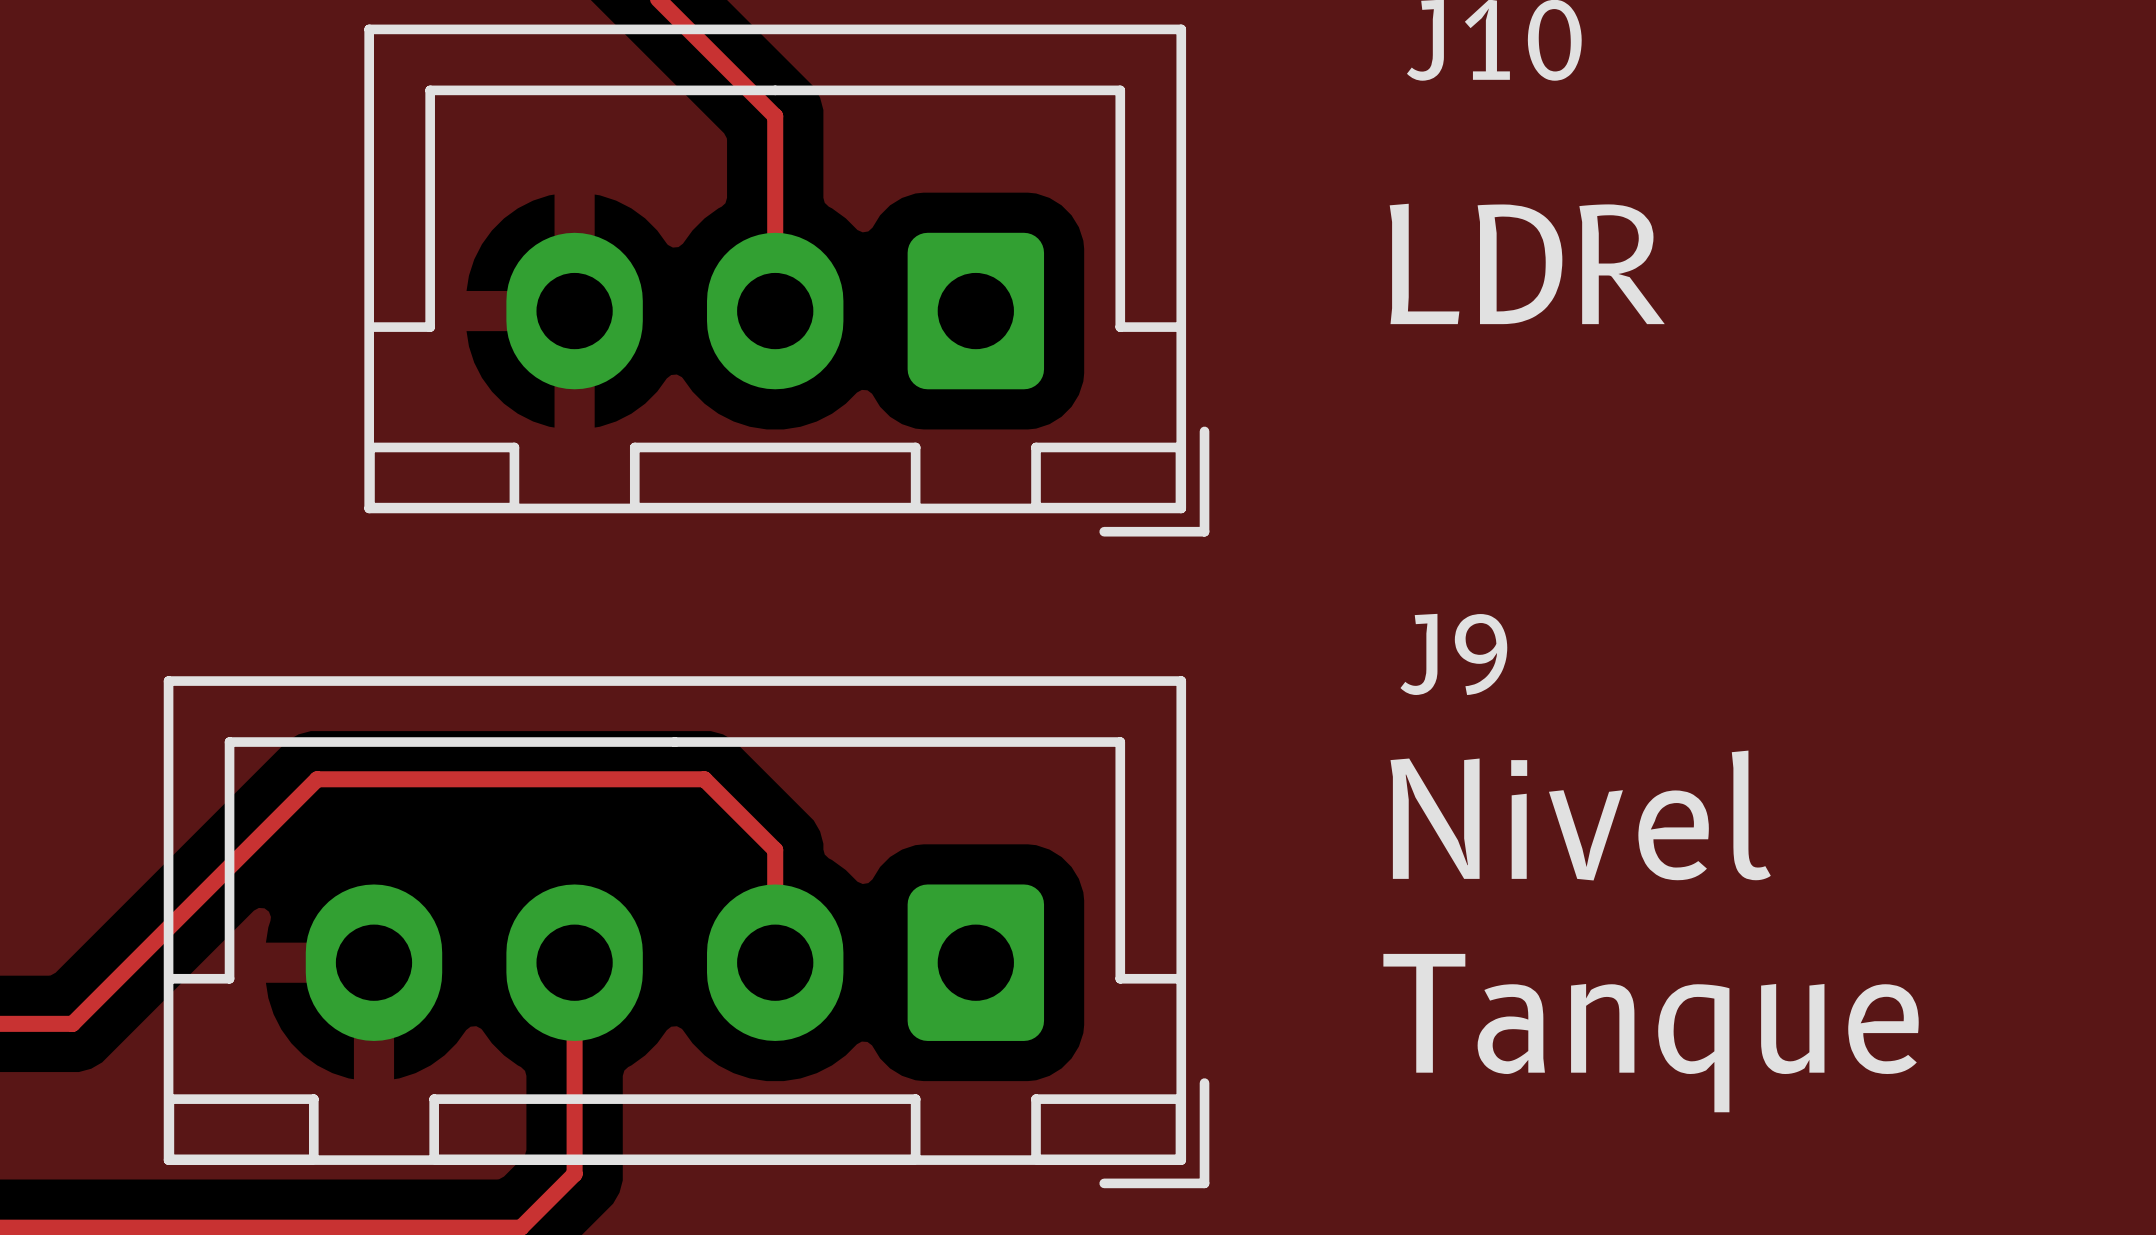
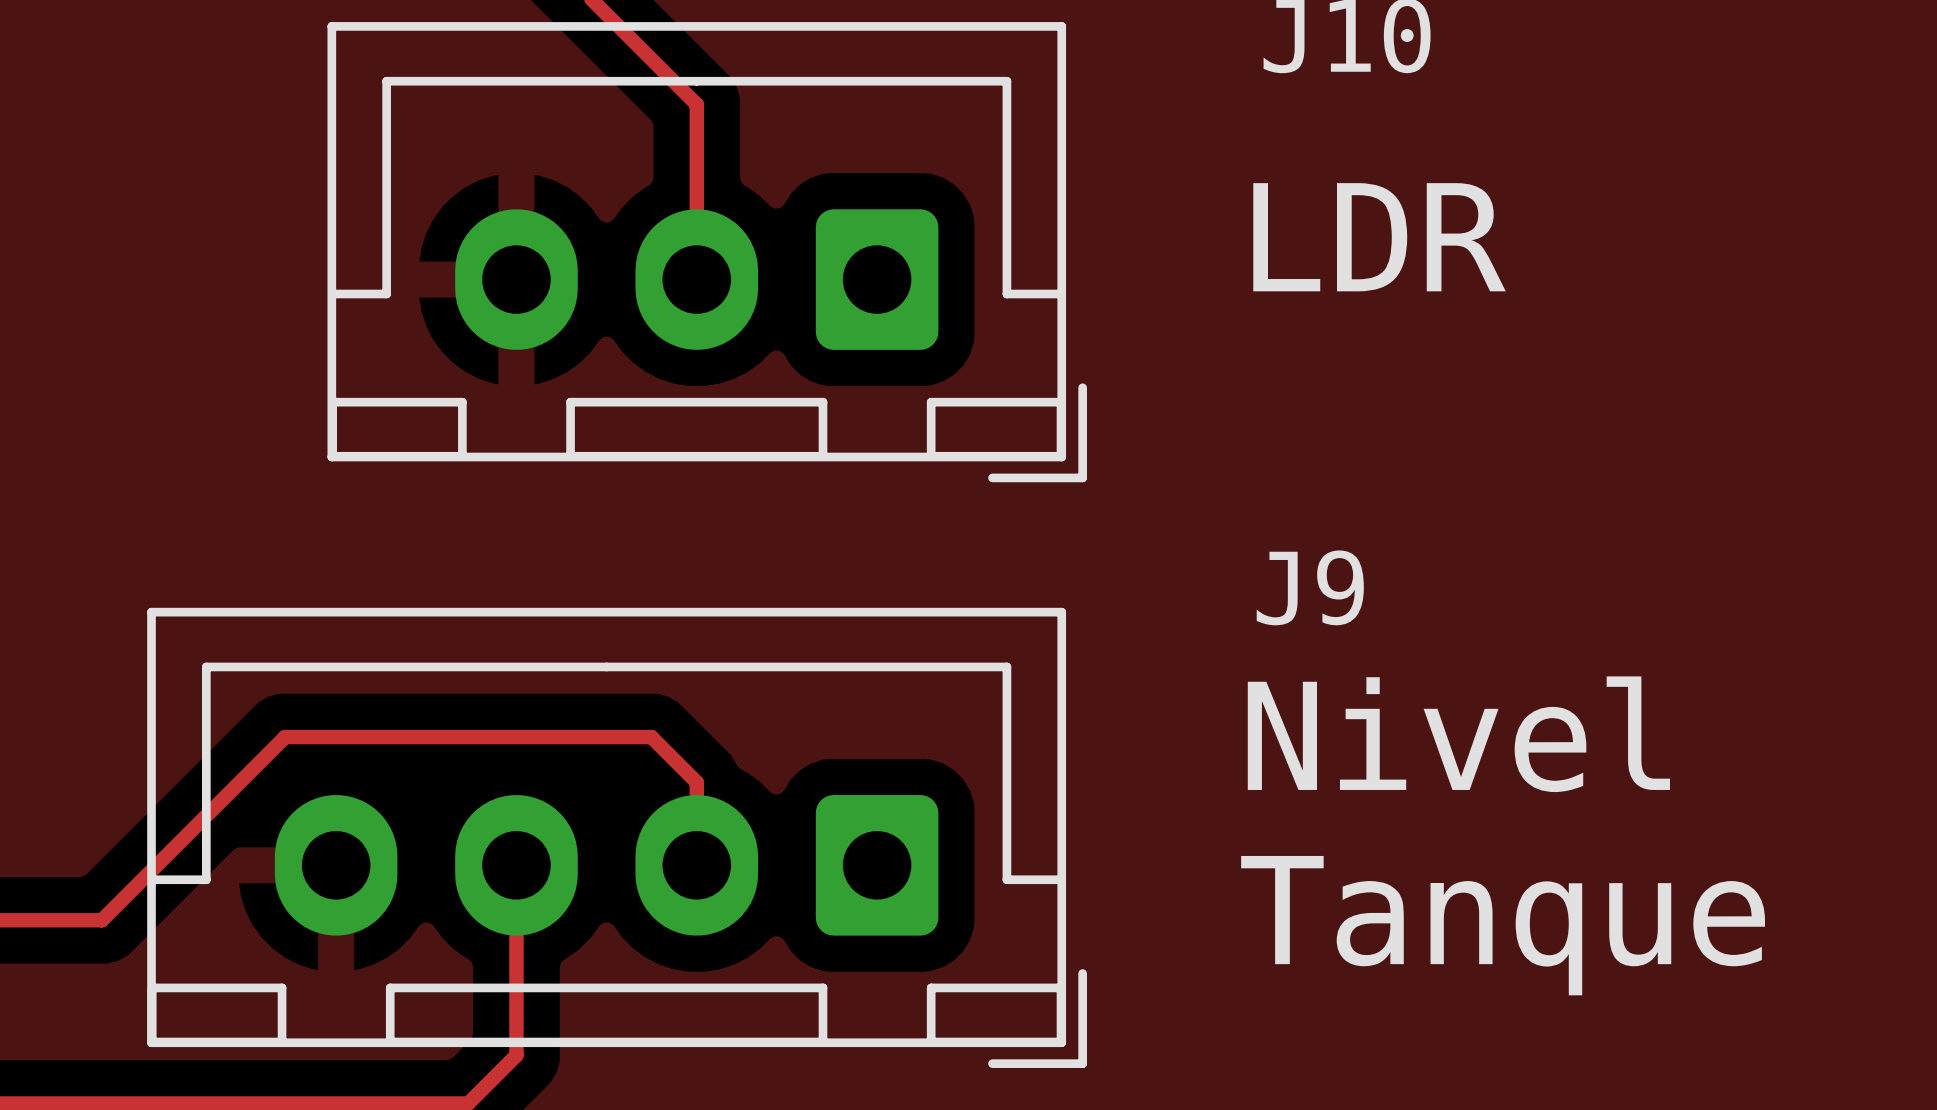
track: (775, 870) (775, 850) (704, 779) (317, 779) (72, 1023) -> (696, 782) (651, 737) (285, 737) (101, 920) (65, 920)

